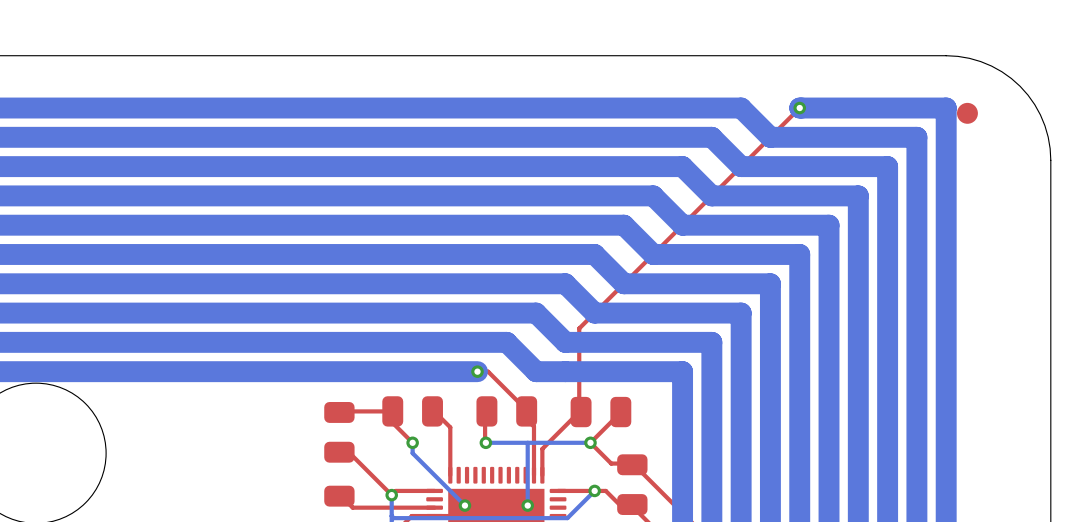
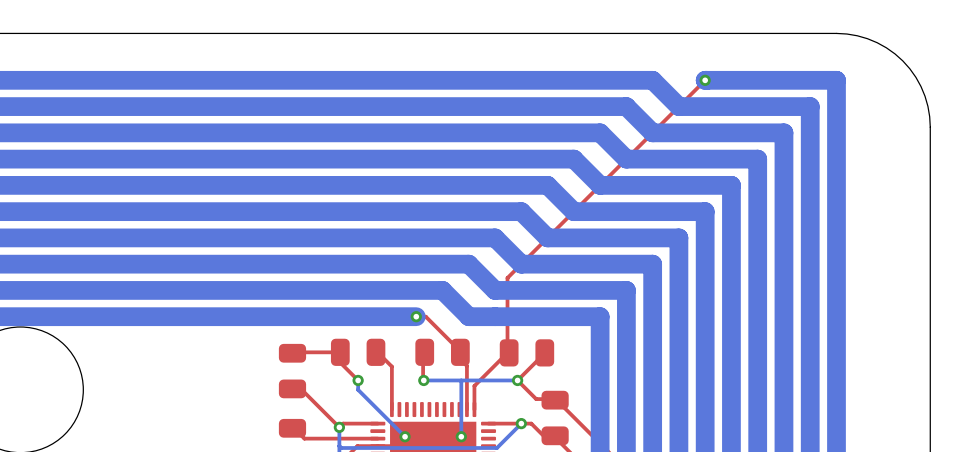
part: (967, 113) -> none

